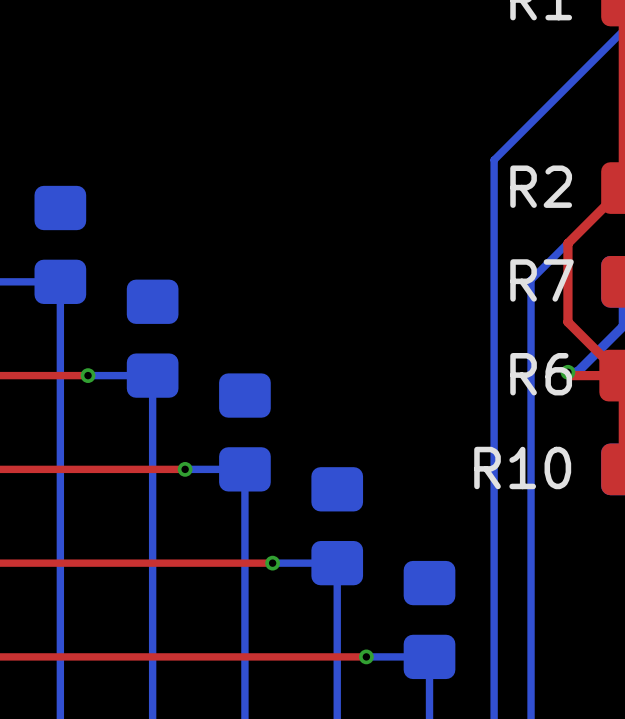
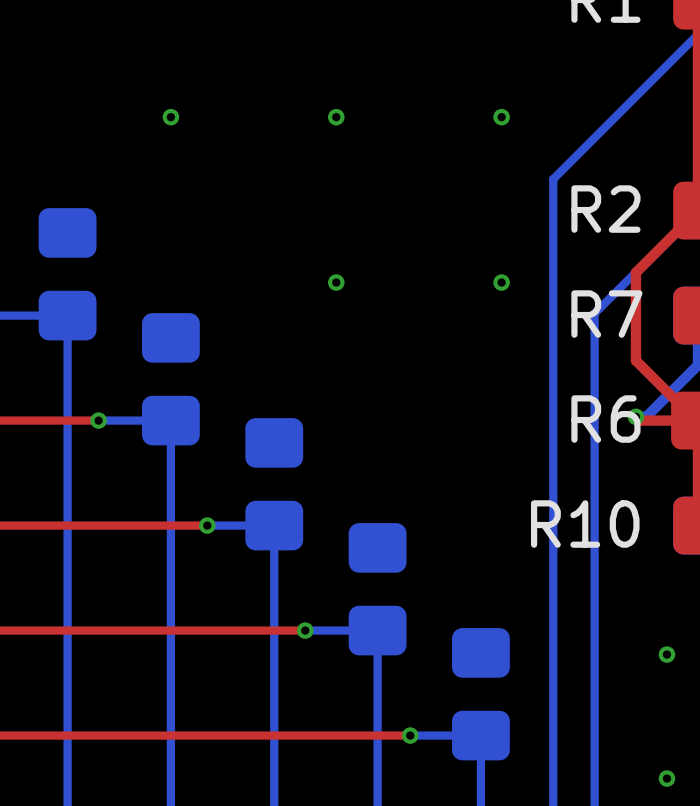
via: none -> (170, 117)
via: none -> (336, 117)
via: none -> (501, 117)
via: none -> (336, 282)
via: none -> (501, 282)
via: none -> (666, 654)
via: none -> (666, 778)

